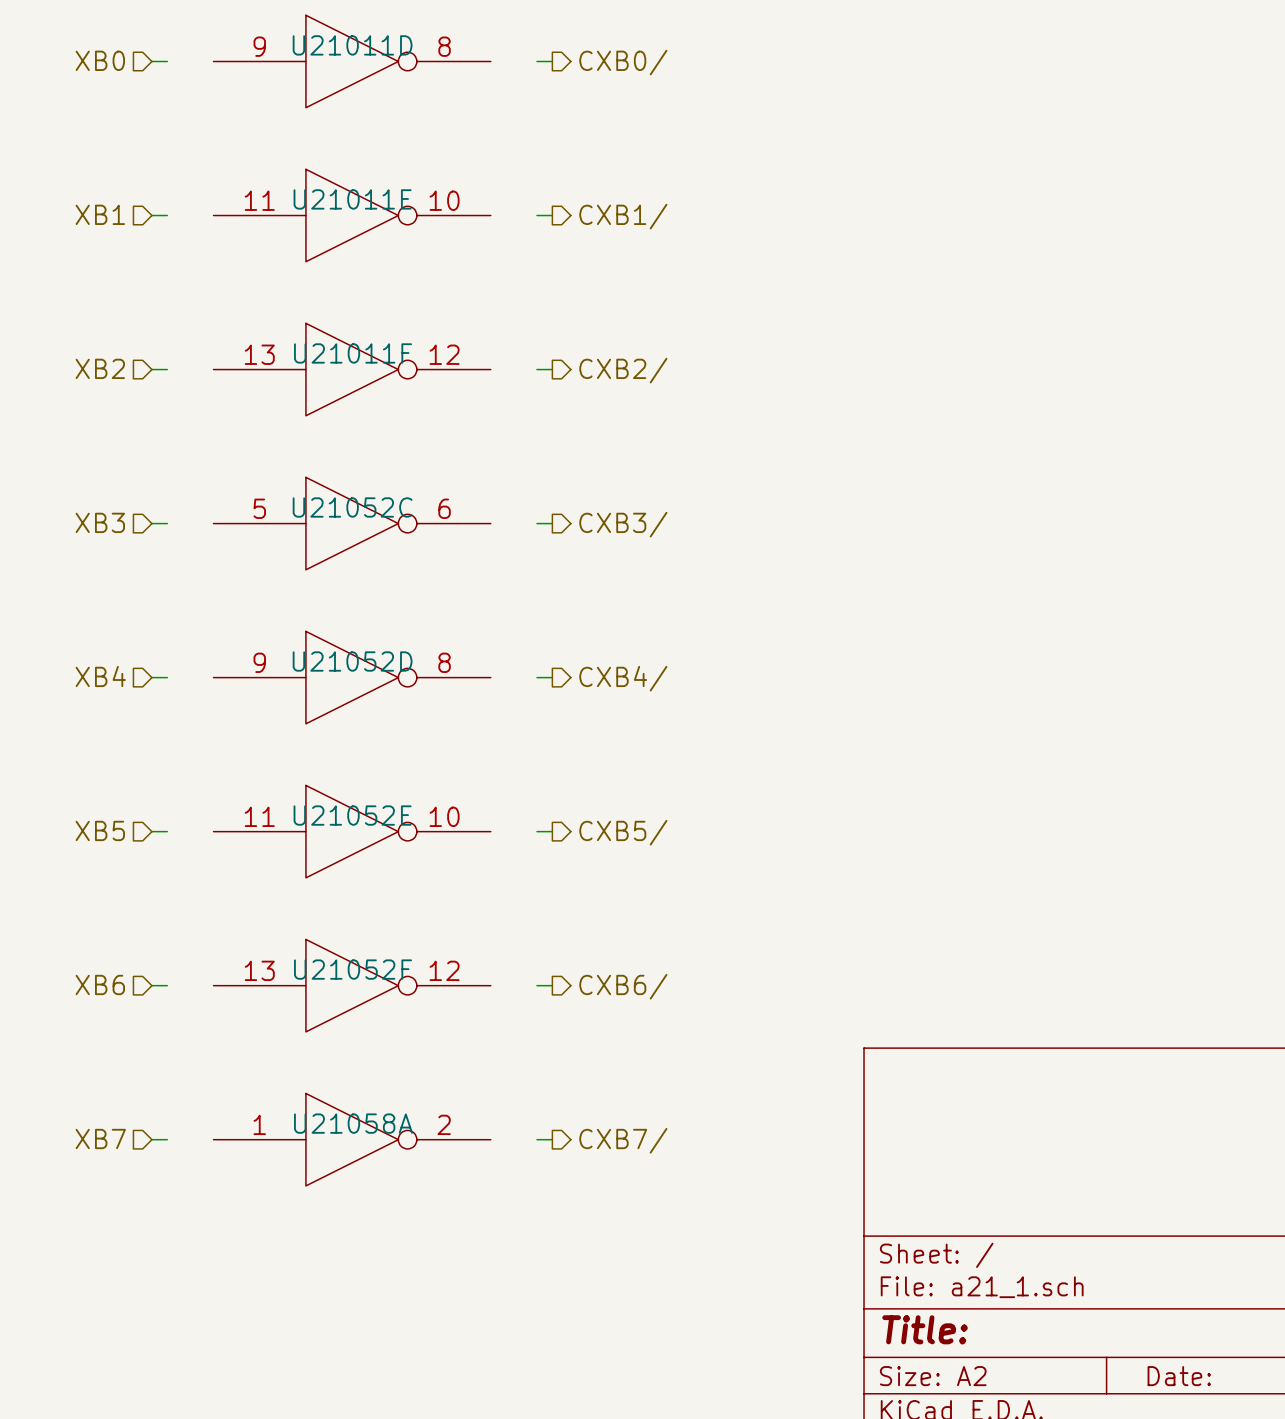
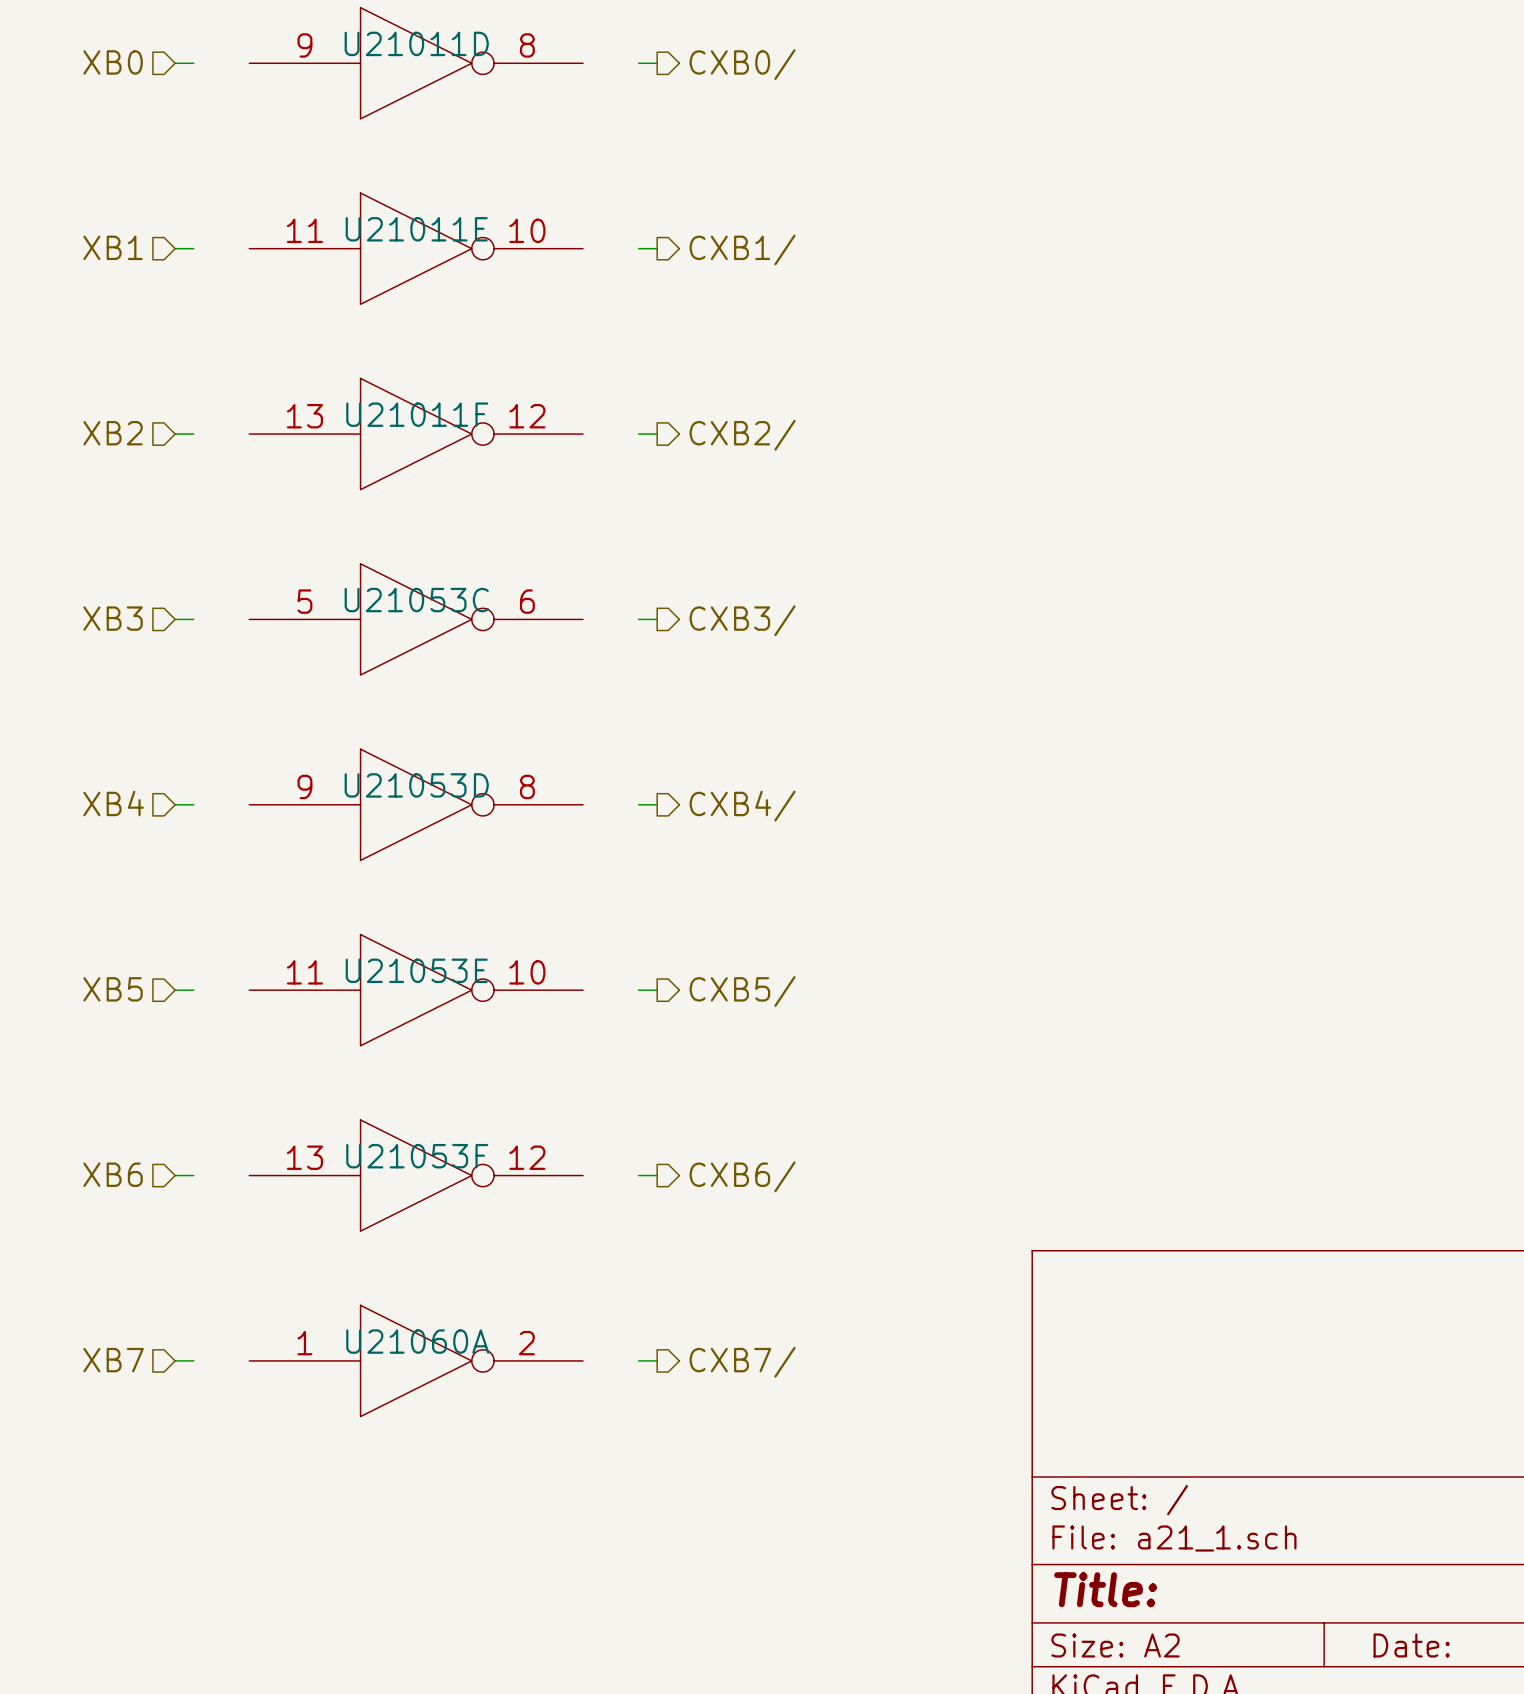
U21052C name: U21052C (352, 507) -> U21053C (416, 600)
U21052D name: U21052D (352, 661) -> U21053D (416, 785)
U21052E name: U21052E (352, 815) -> U21053E (416, 970)
U21052F name: U21052F (353, 969) -> U21053F (417, 1156)
U21058A name: U21058A (353, 1123) -> U21060A (417, 1341)

